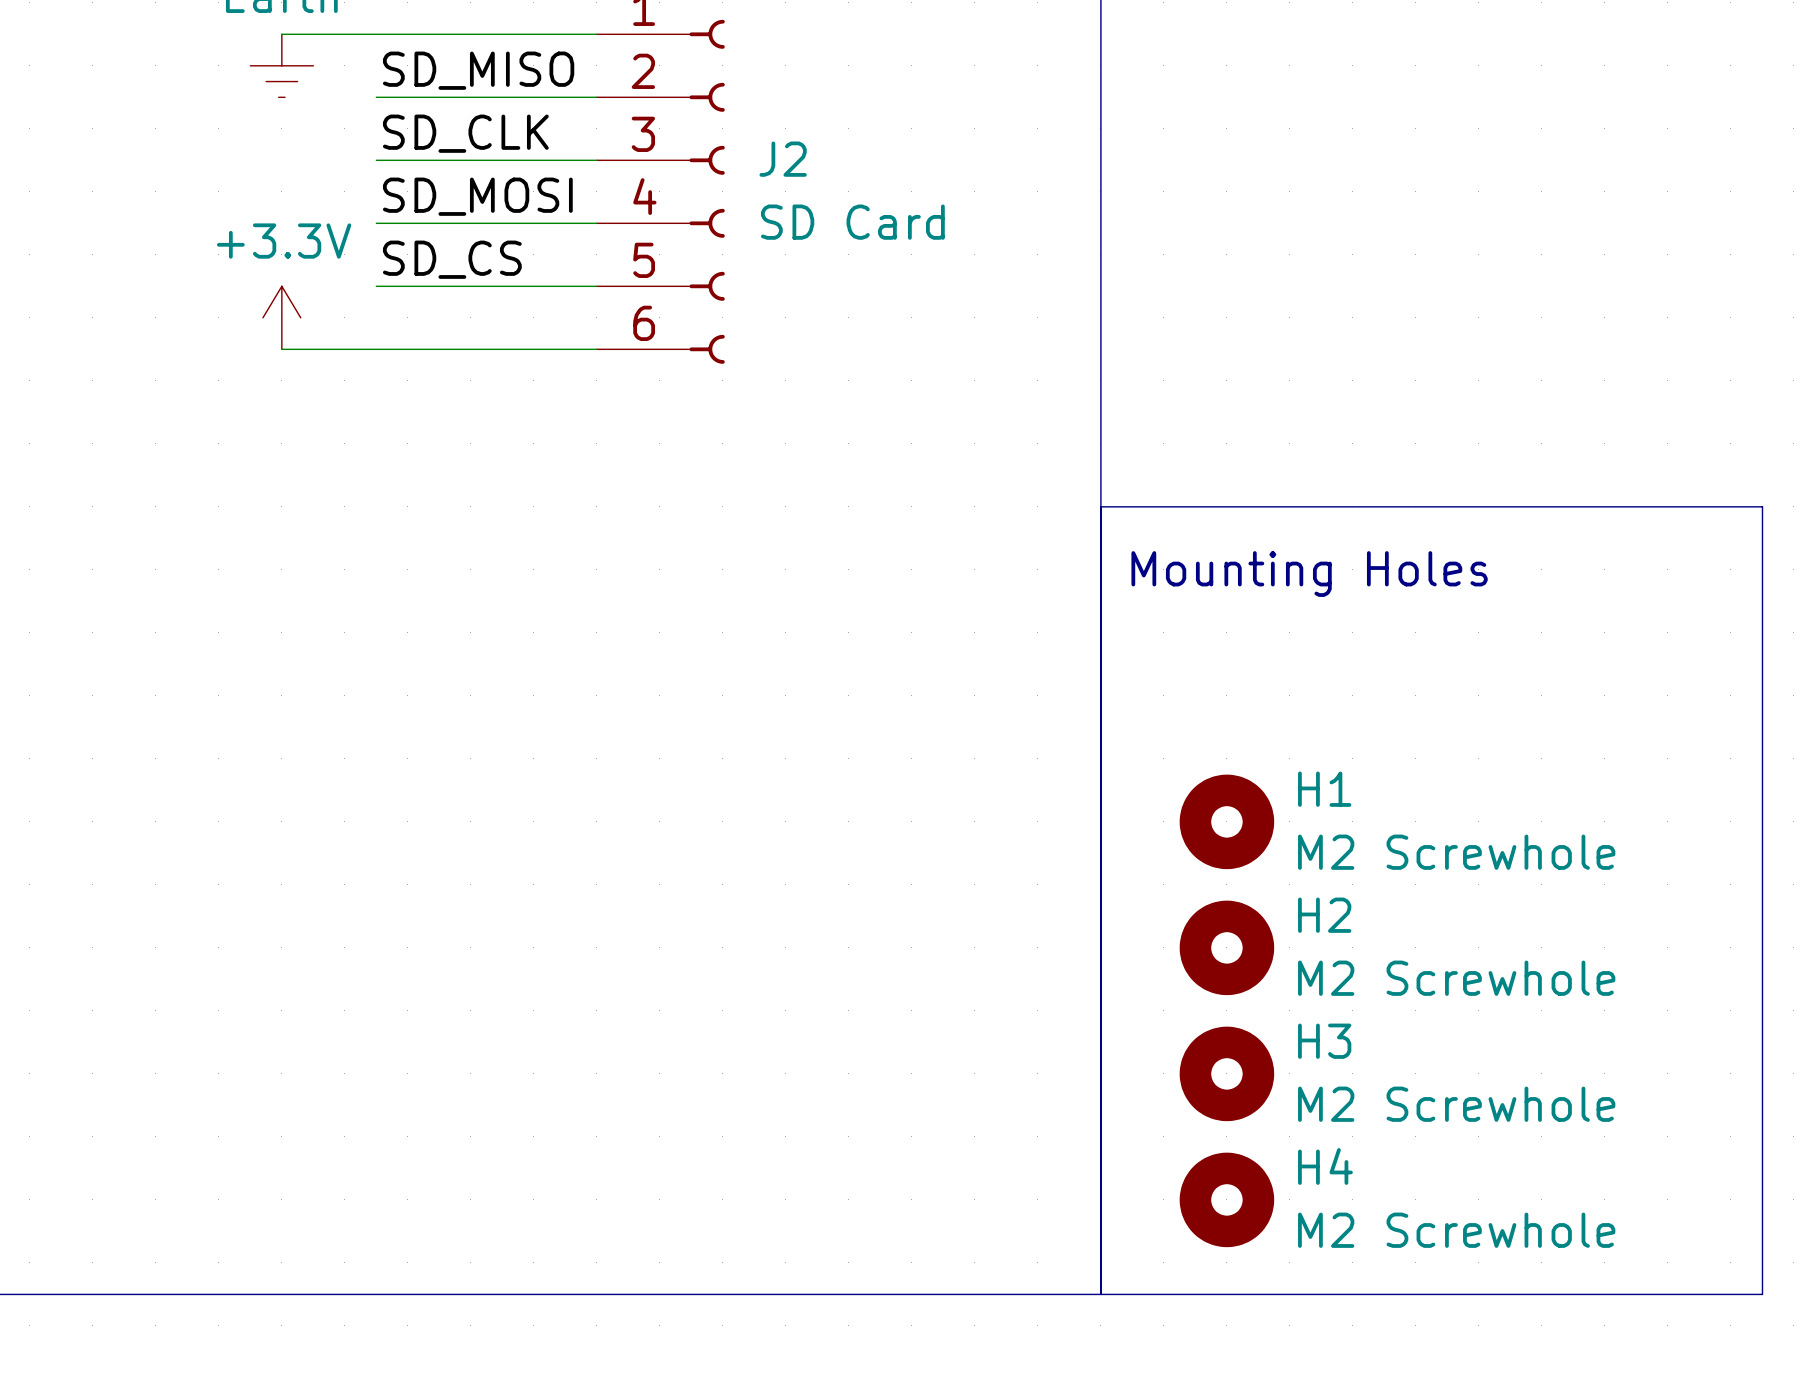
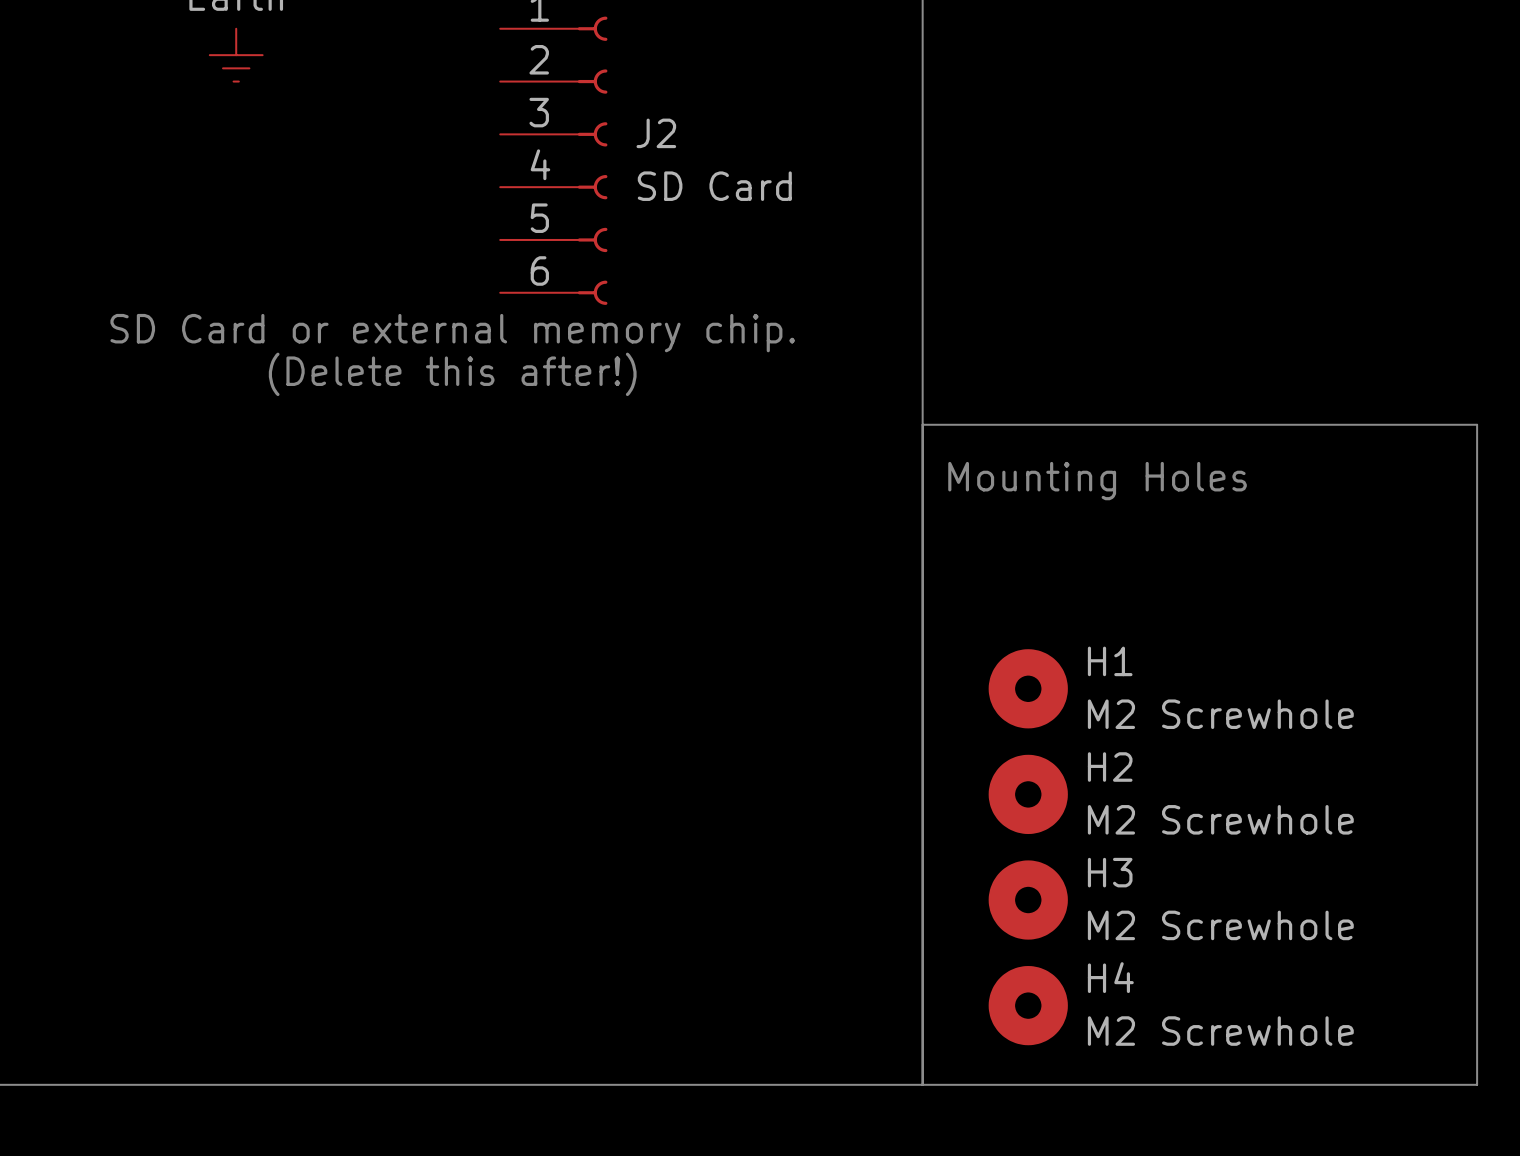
wire: (281, 34) (596, 34) -> none
label: SD_MISO (478, 70) -> none
wire: (376, 97) (596, 97) -> none
label: SD_CLK (465, 133) -> none
wire: (376, 160) (596, 160) -> none
label: SD_MOSI (477, 196) -> none
wire: (376, 223) (596, 223) -> none
label: SD_CS (452, 259) -> none
wire: (376, 286) (596, 286) -> none
power symbol: +3.3V (281, 317) -> none
wire: (281, 349) (596, 349) -> none
text: none -> SD Card or external memory chip. (452, 333)
text: none -> (Delete this after!) (452, 374)

